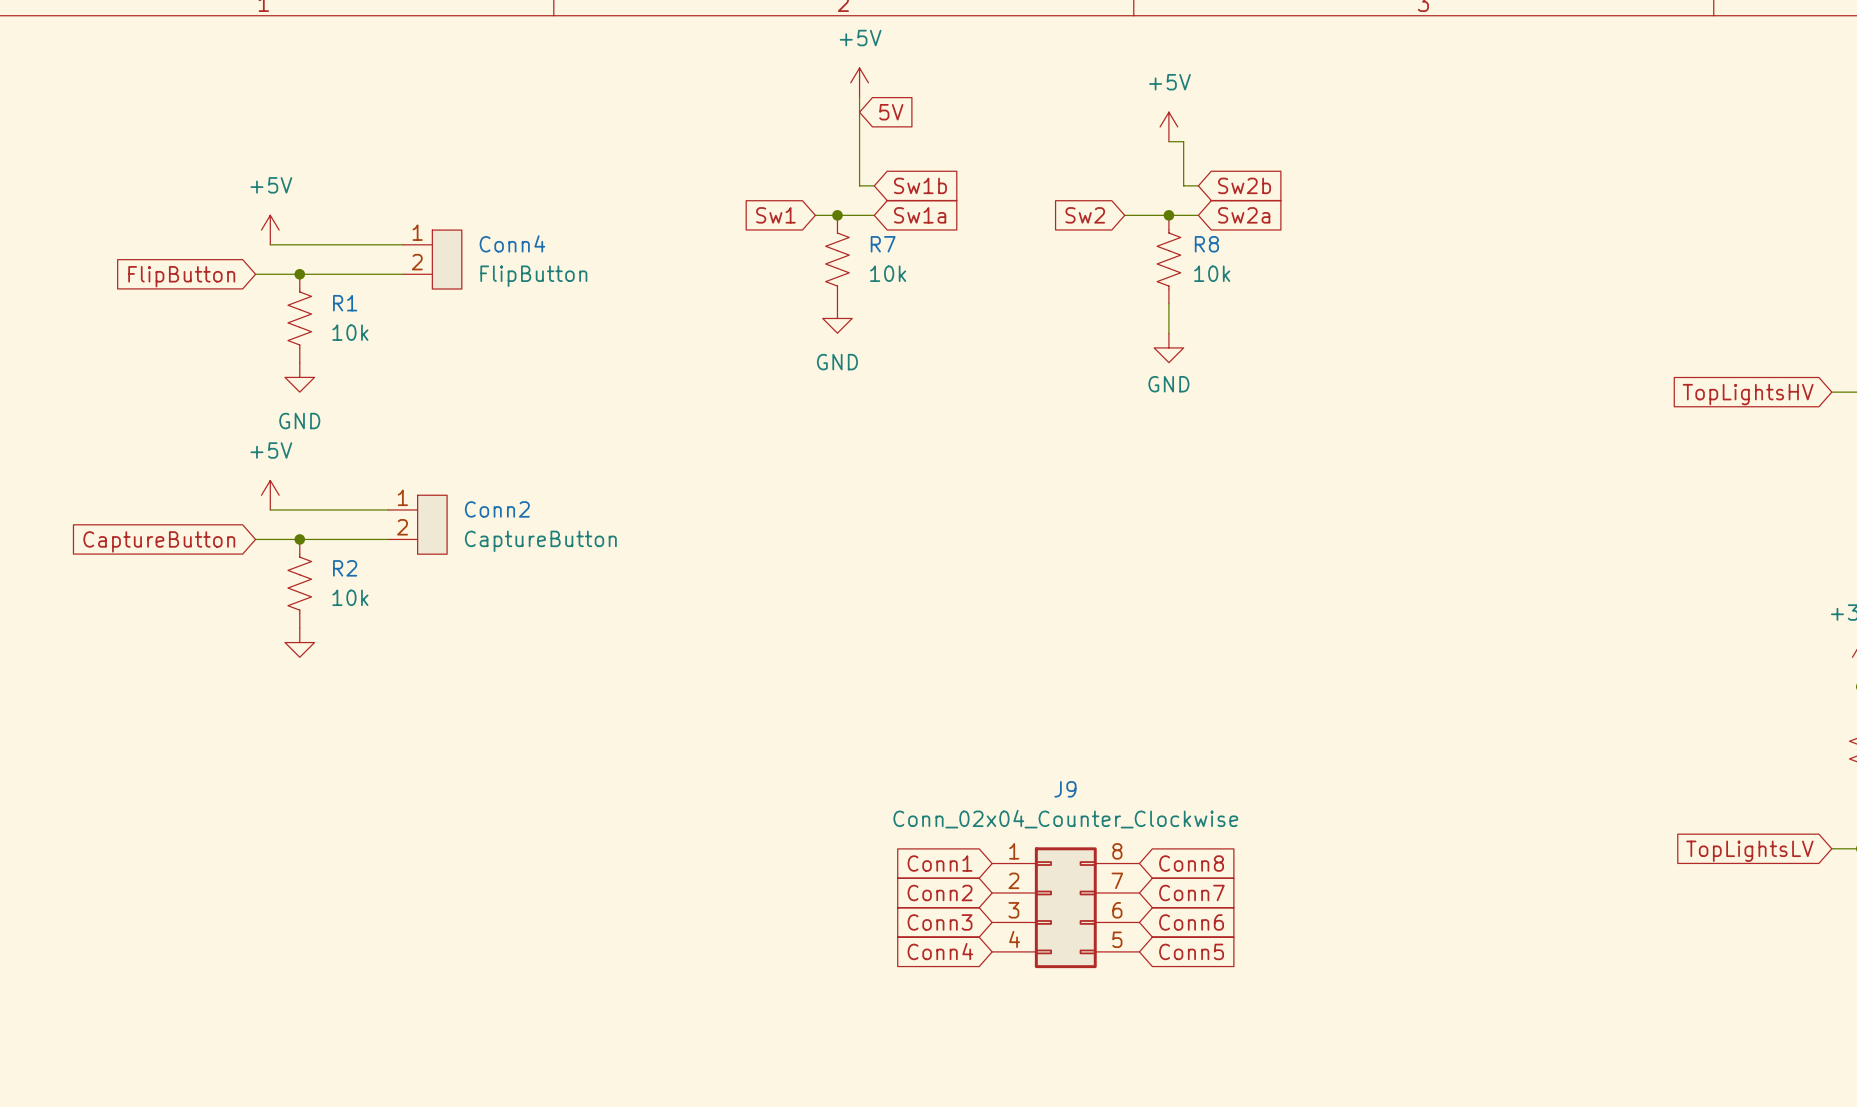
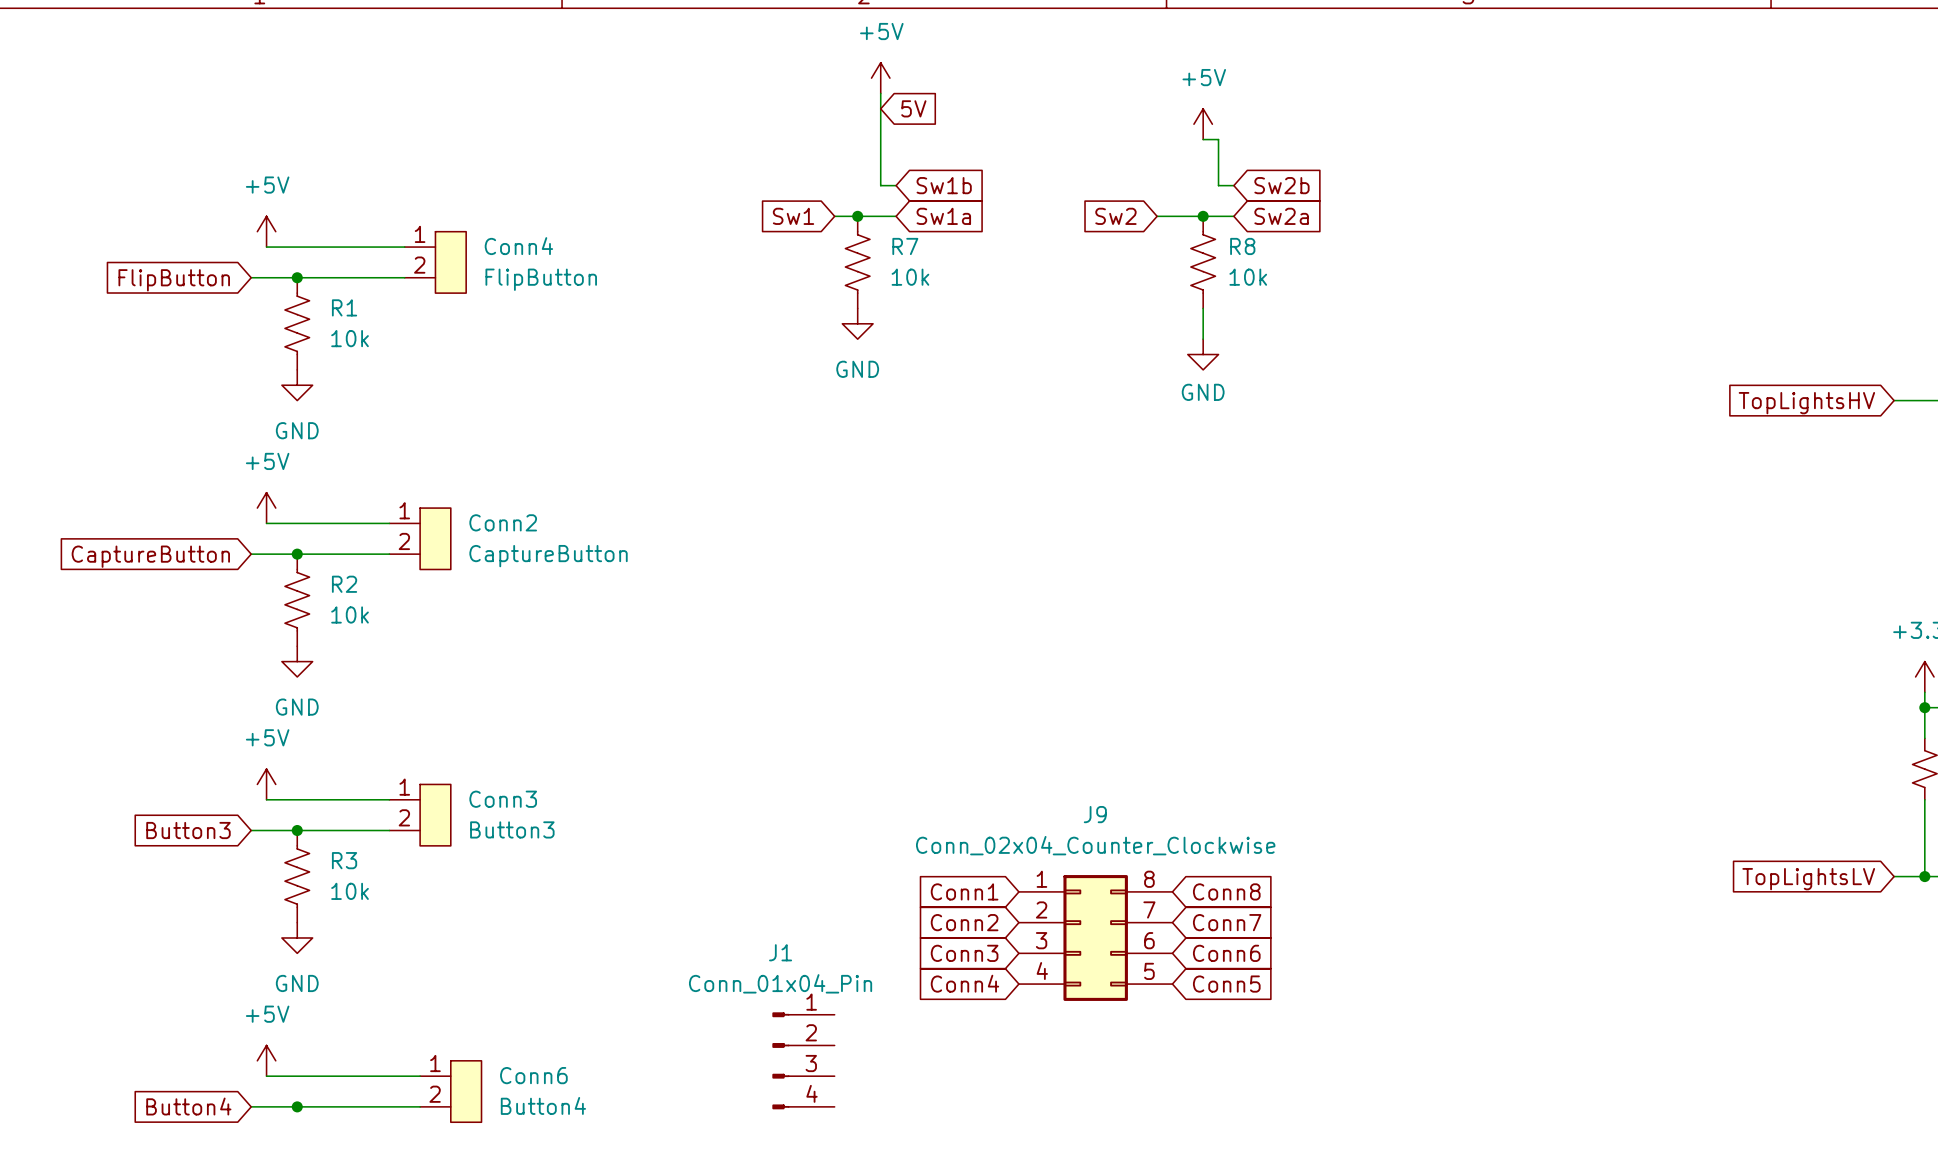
power symbol text: none -> GND (297, 707)
power symbol: none -> +5V (266, 784)
wire: none -> (266, 799) (389, 799)
Conn3: none -> Button3 (420, 815)
global label: none -> Button3 (188, 830)
wire: none -> (251, 830) (389, 830)
junction: none -> (297, 830)
R3: none -> 10k (297, 876)
power symbol: none -> GND (297, 937)
power symbol: none -> +5V (266, 1060)
J1: none -> Conn_01x04_Pin (803, 1060)
wire: none -> (266, 1076) (420, 1076)
Conn6: none -> Button4 (450, 1091)
global label: none -> Button4 (188, 1106)
wire: none -> (251, 1106) (420, 1106)
junction: none -> (297, 1106)

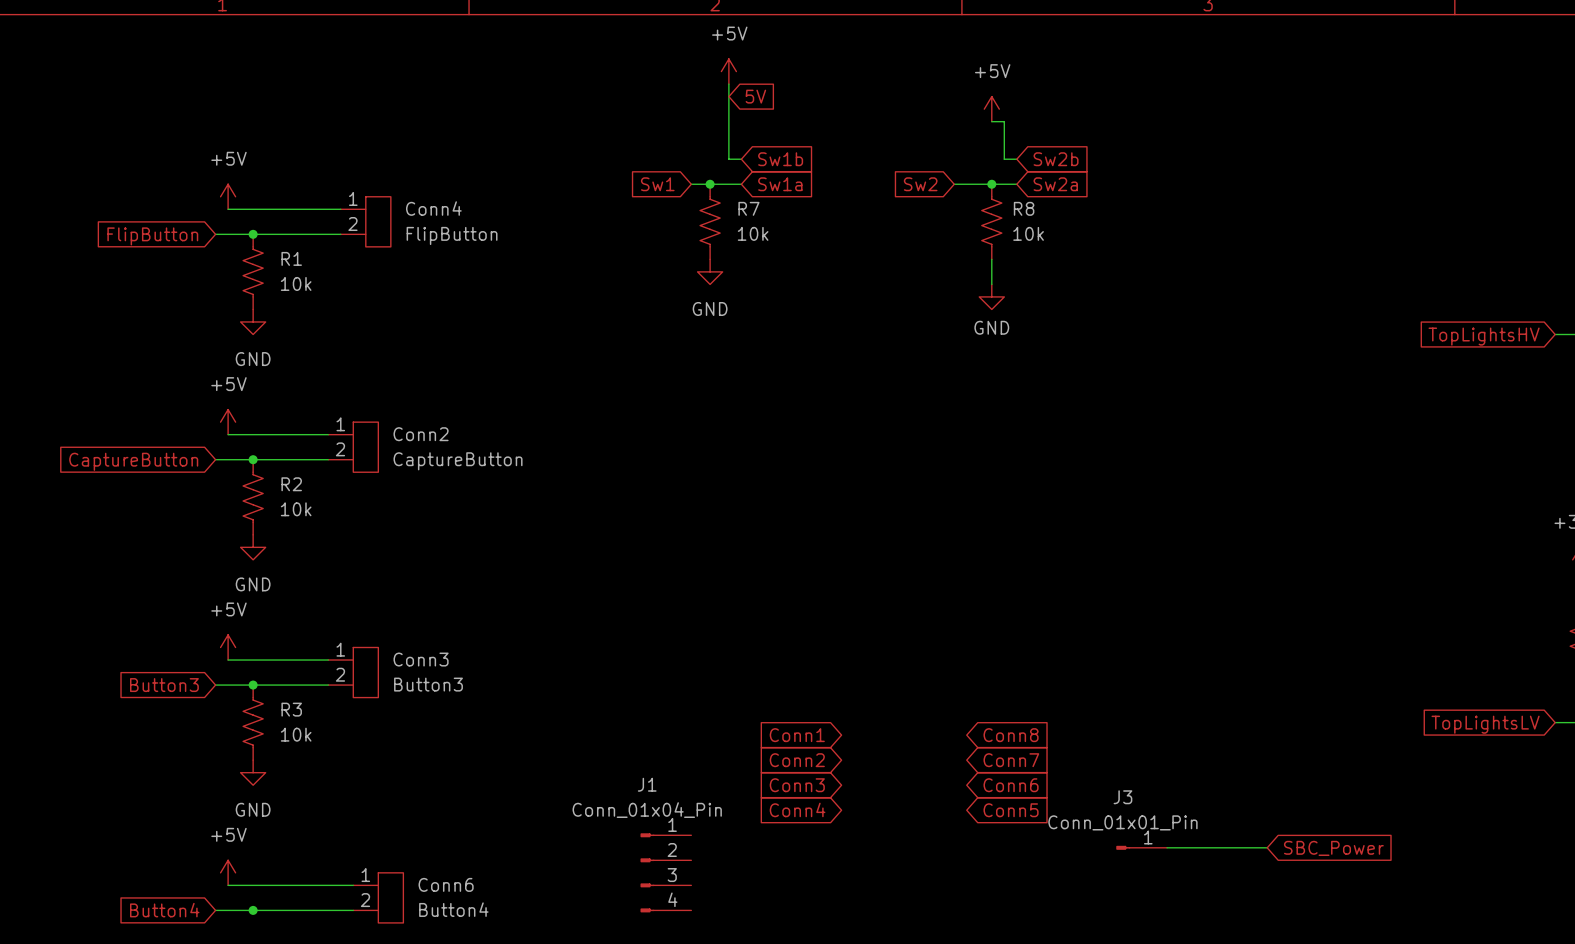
J9: Conn_02x04_Counter_Clockwise (1095, 937) -> none
J3: none -> Conn_01x01_Pin (1141, 847)
wire: none -> (1167, 847) (1267, 847)
global label: none -> SBC_Power (1333, 848)

